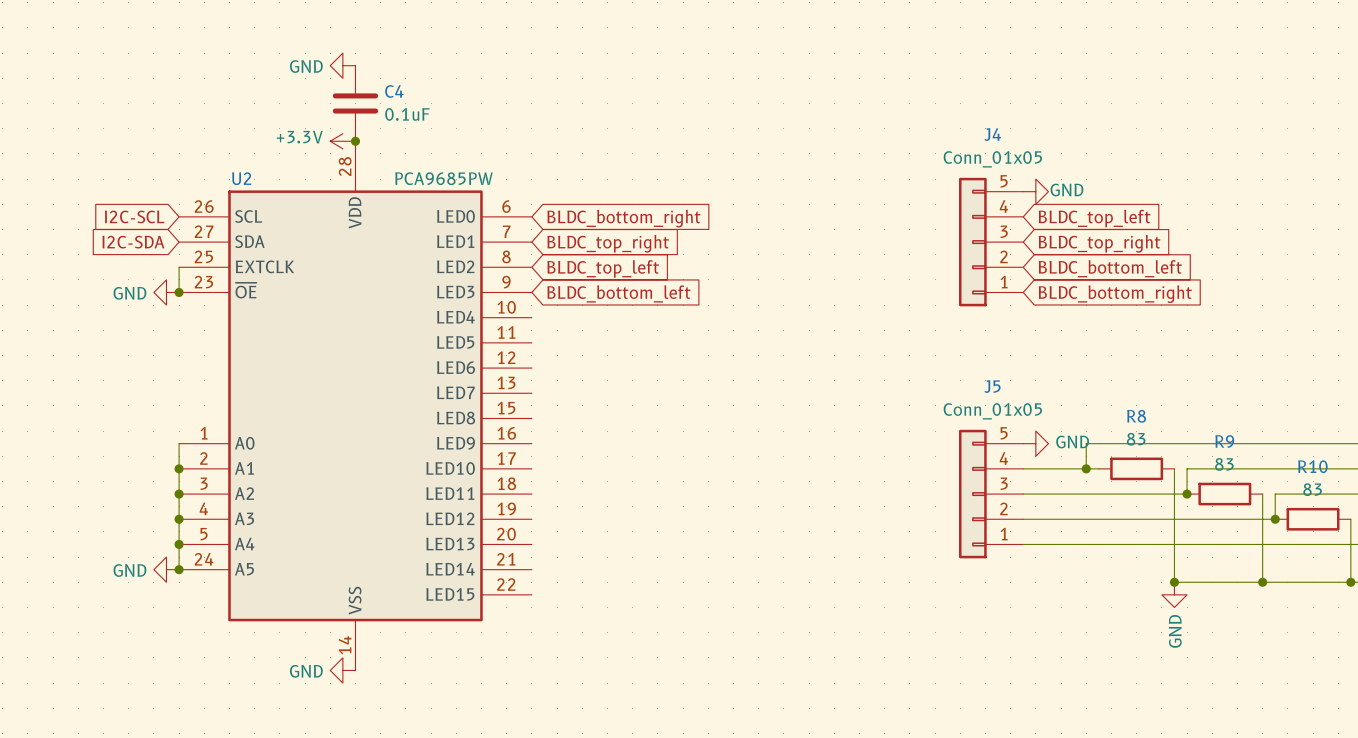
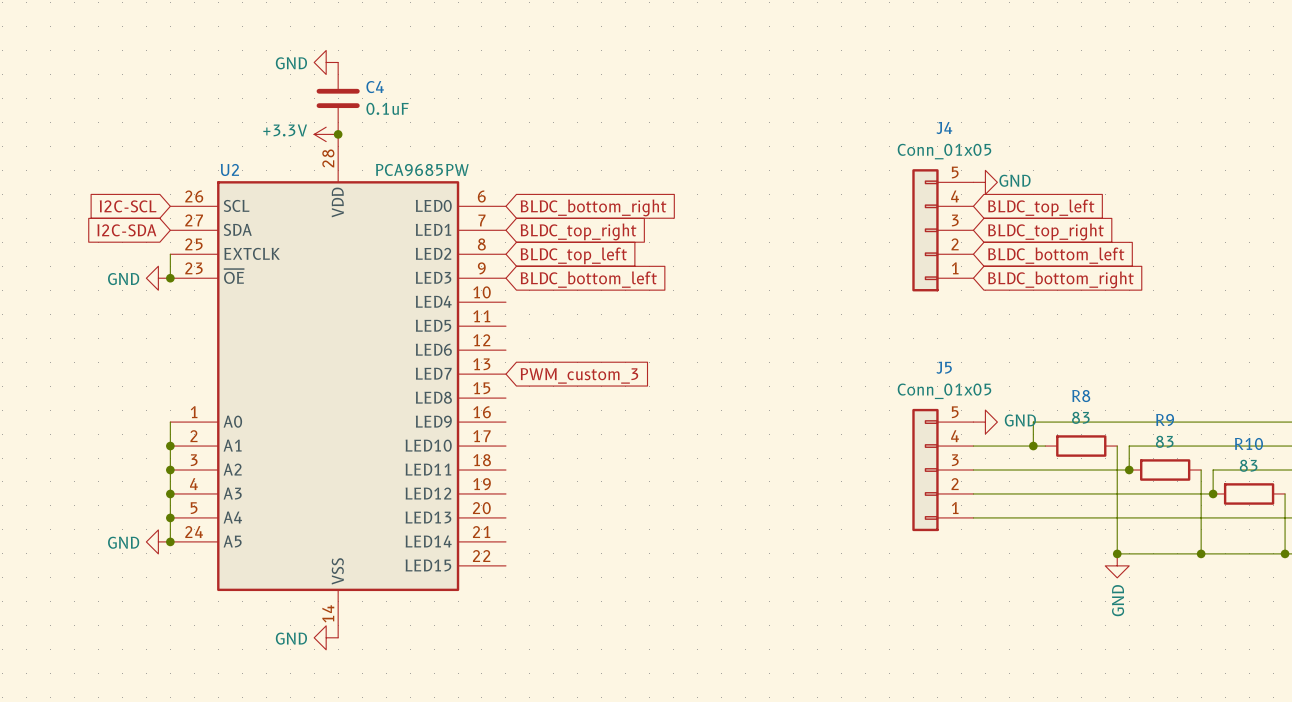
global label: none -> PWM_custom_3 (579, 375)

